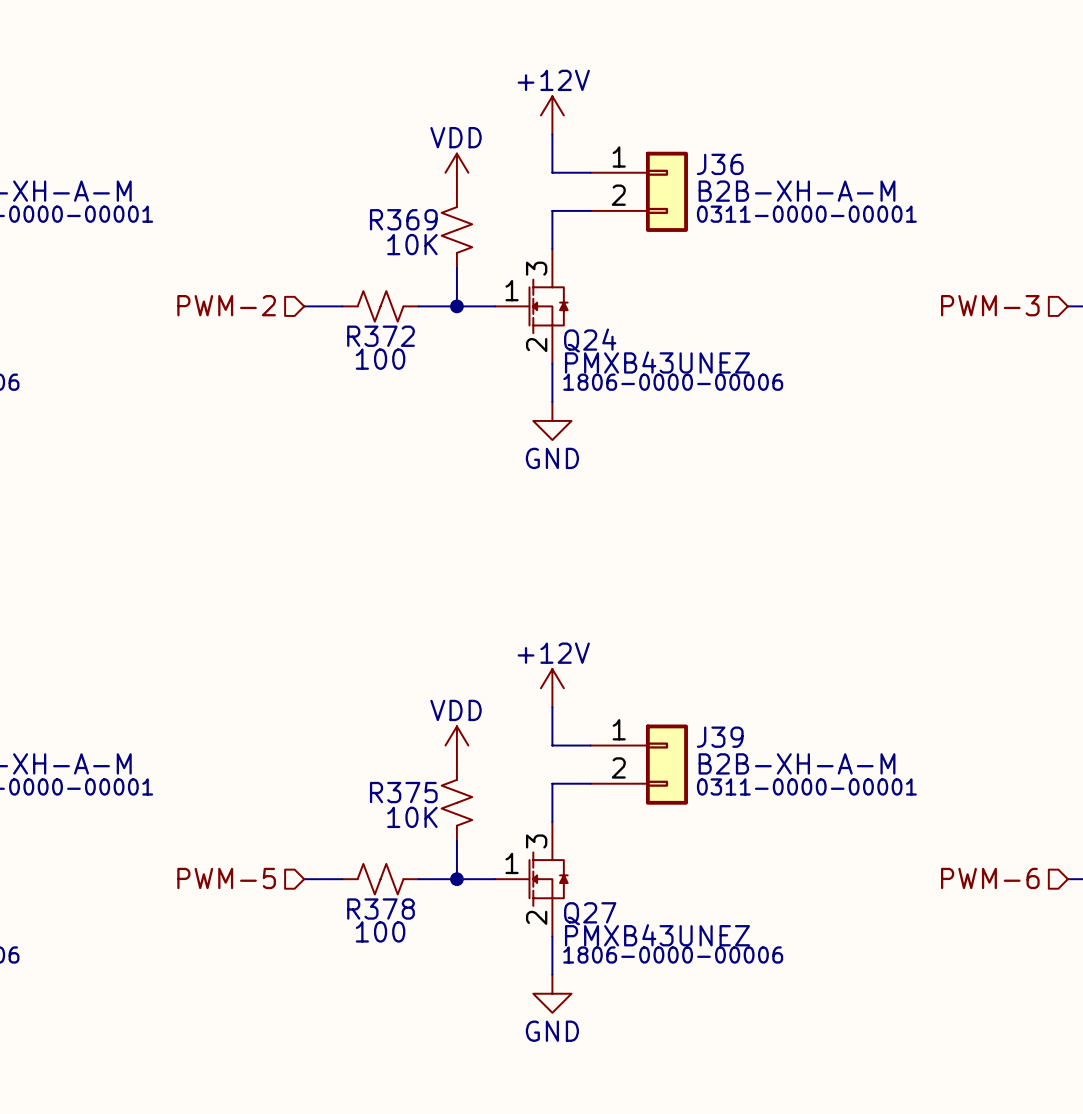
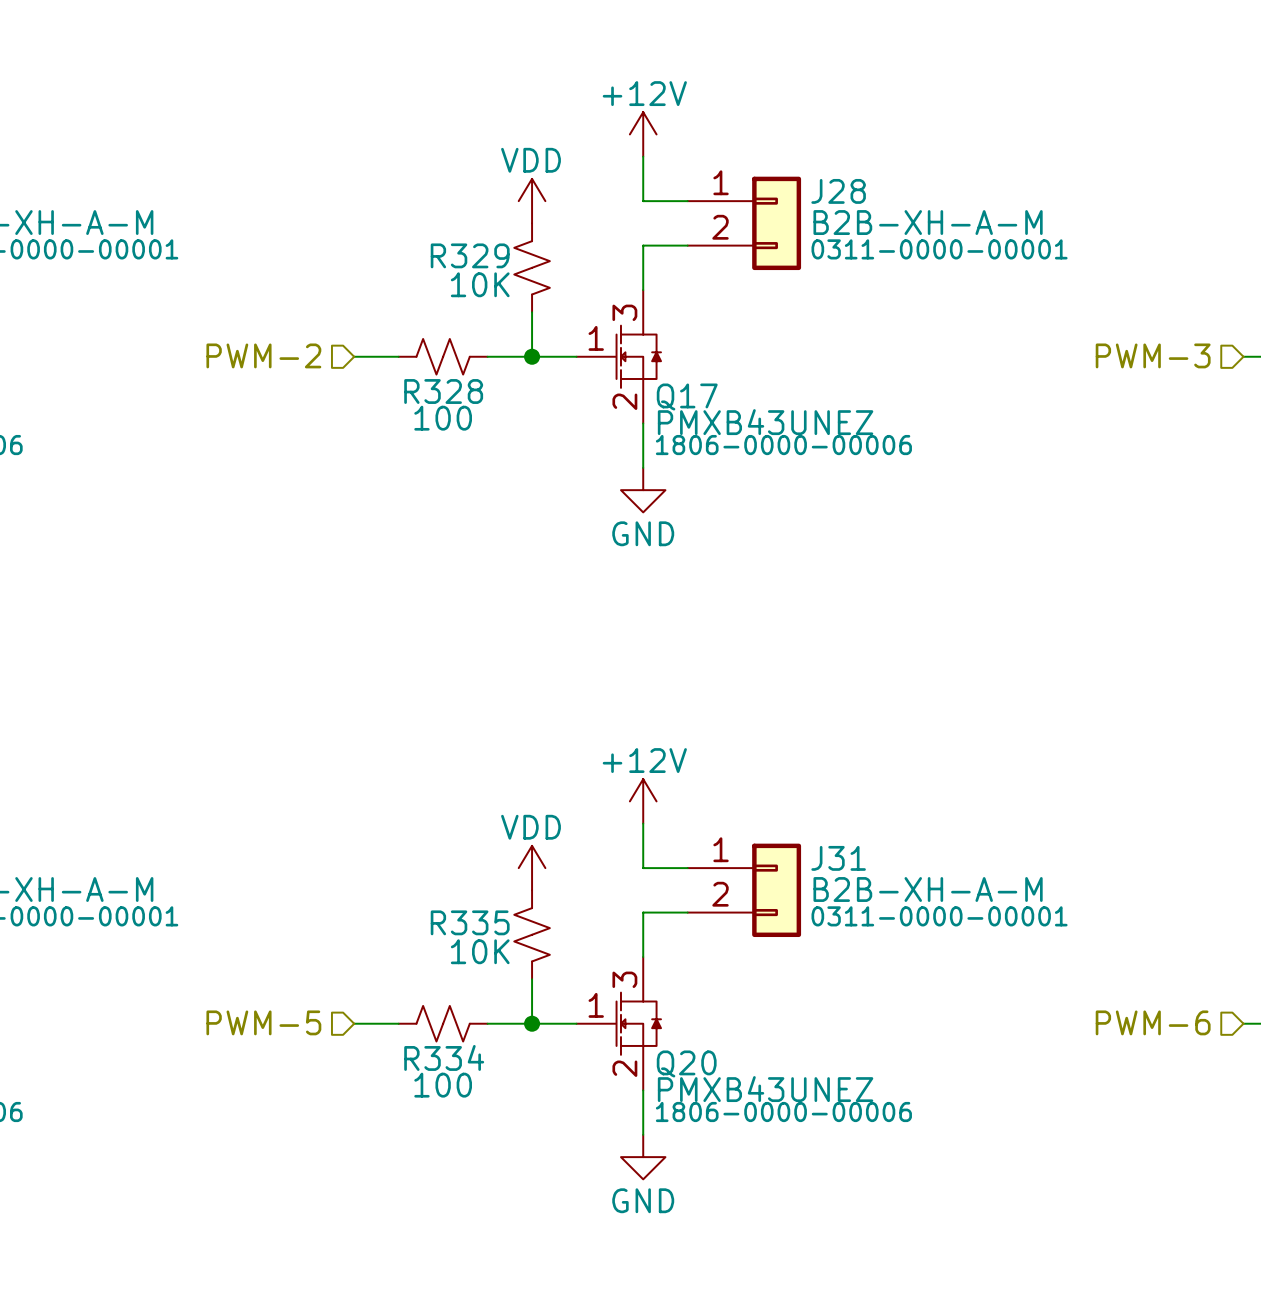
J36 name: J36 (720, 164) -> J28 (838, 191)
R369 name: R369 (403, 219) -> R329 (470, 255)
R372 name: R372 (381, 336) -> R328 (443, 391)
Q24 name: Q24 (590, 340) -> Q17 (687, 397)
J39 name: J39 (720, 737) -> J31 (838, 858)
R375 name: R375 (403, 792) -> R335 (470, 922)
R378 name: R378 (381, 909) -> R334 (444, 1057)
Q27 name: Q27 (590, 913) -> Q20 (686, 1063)

